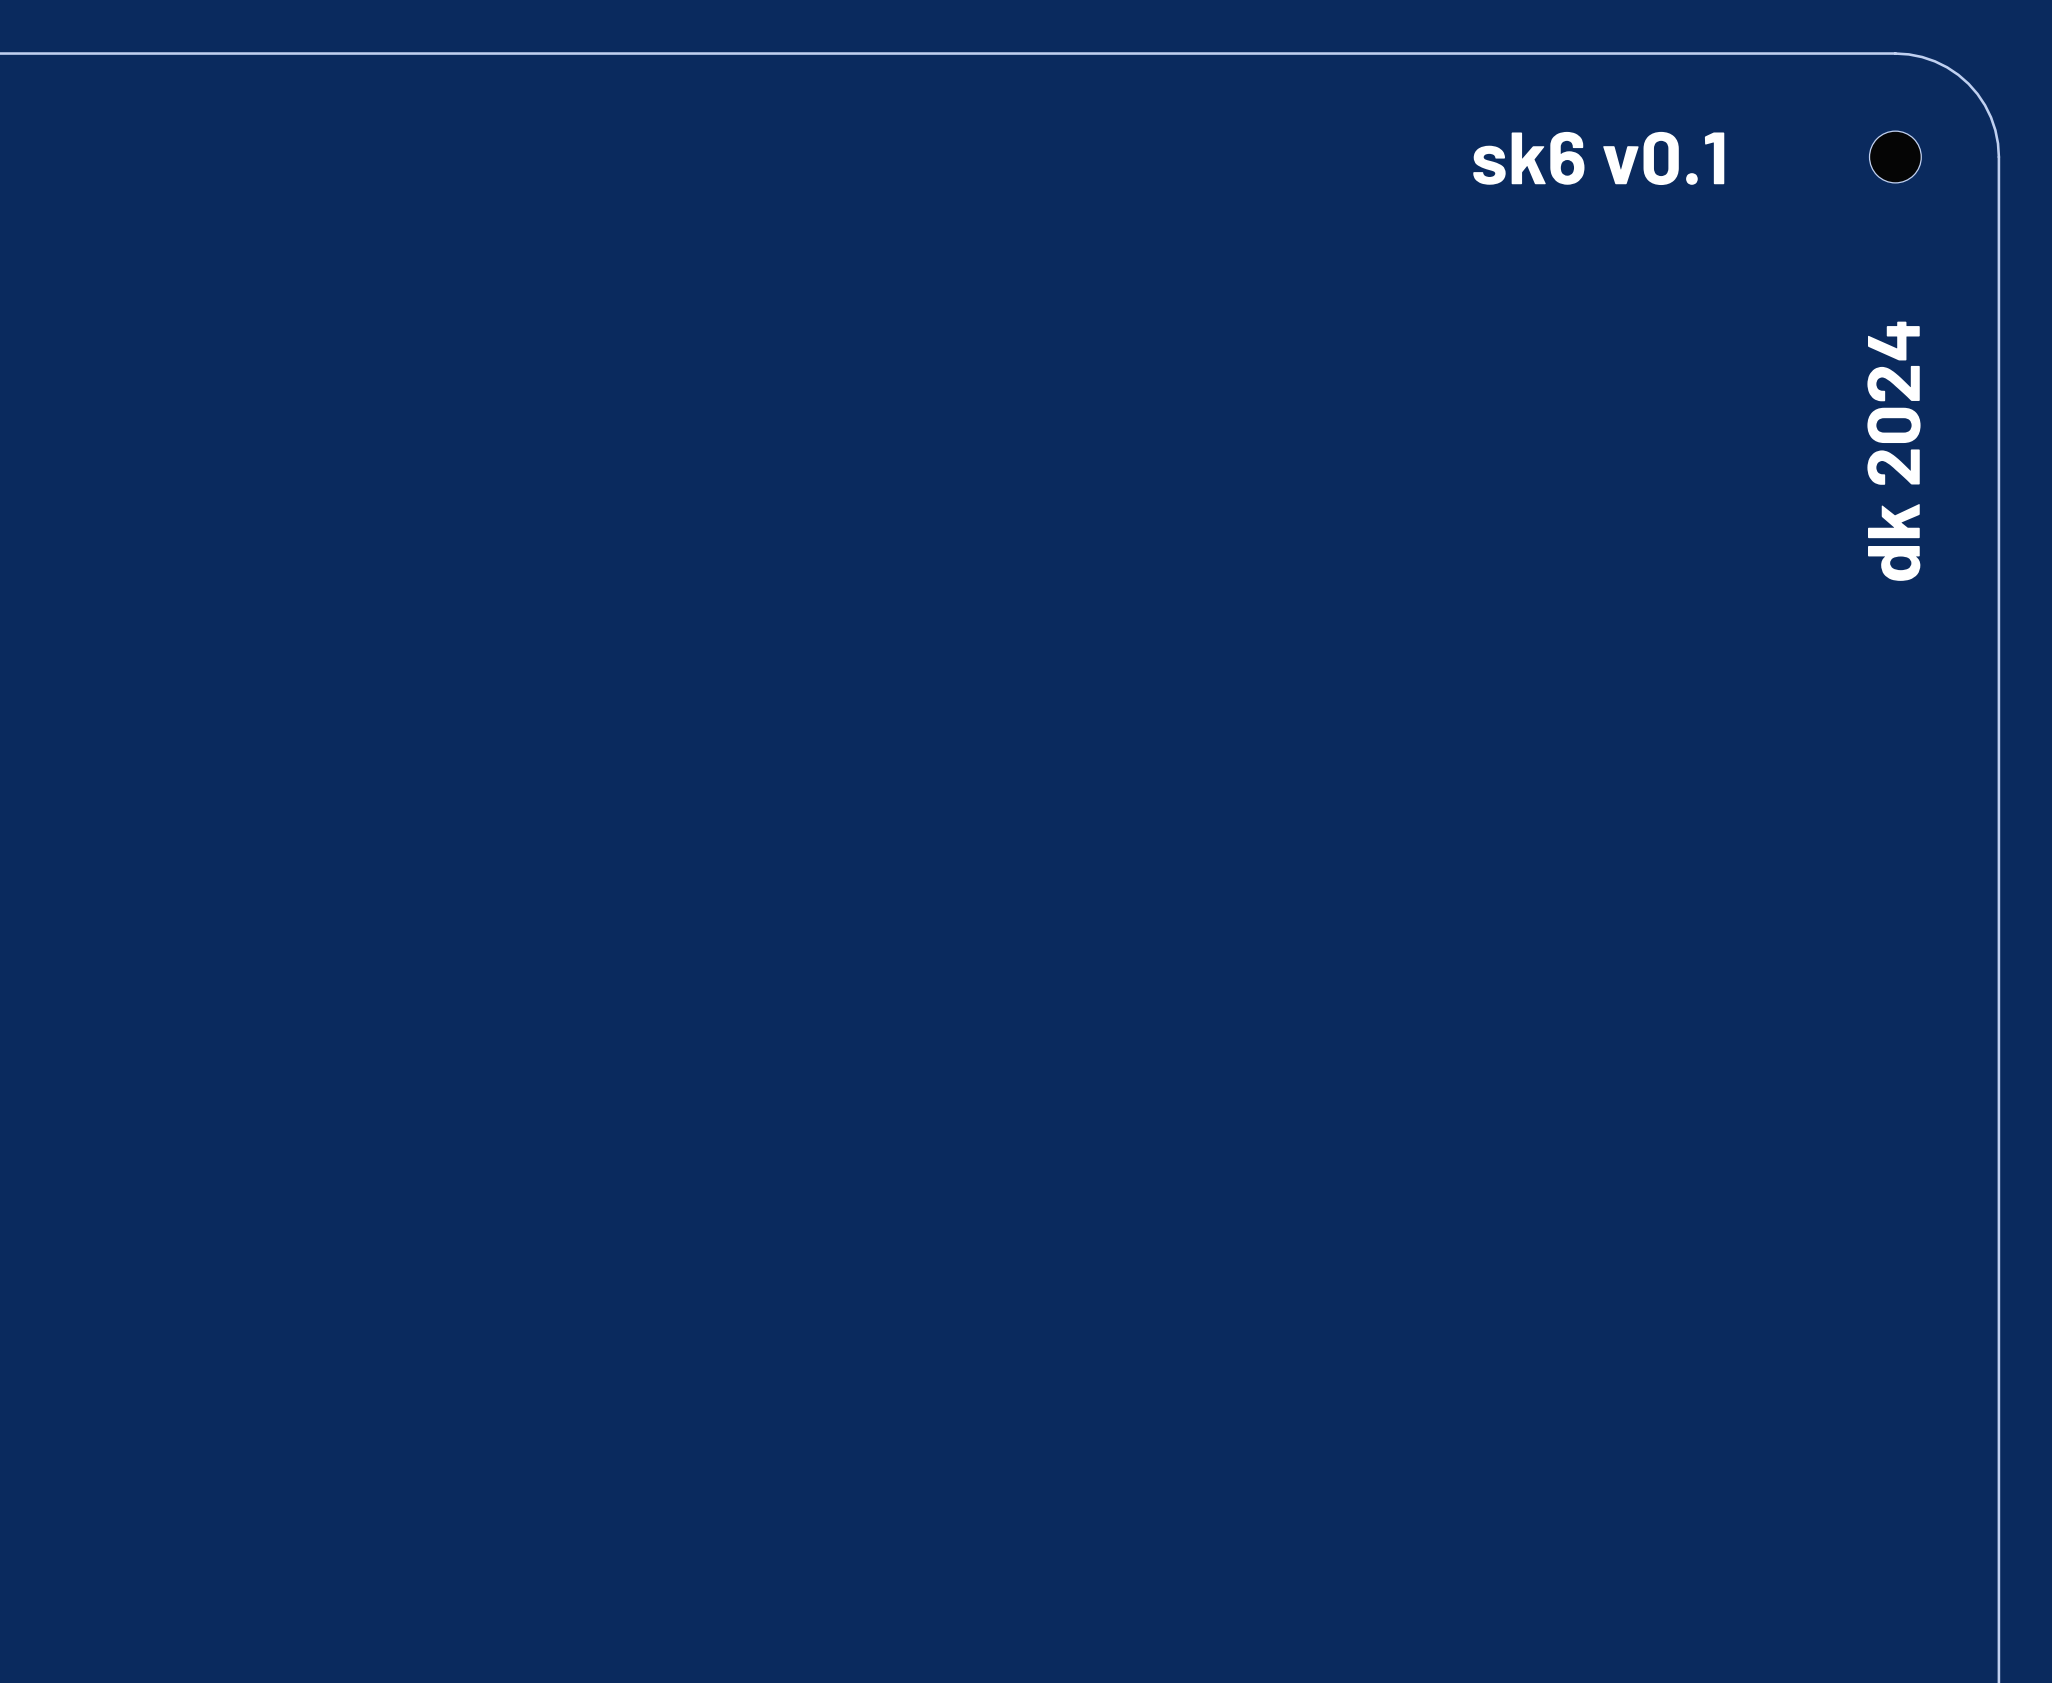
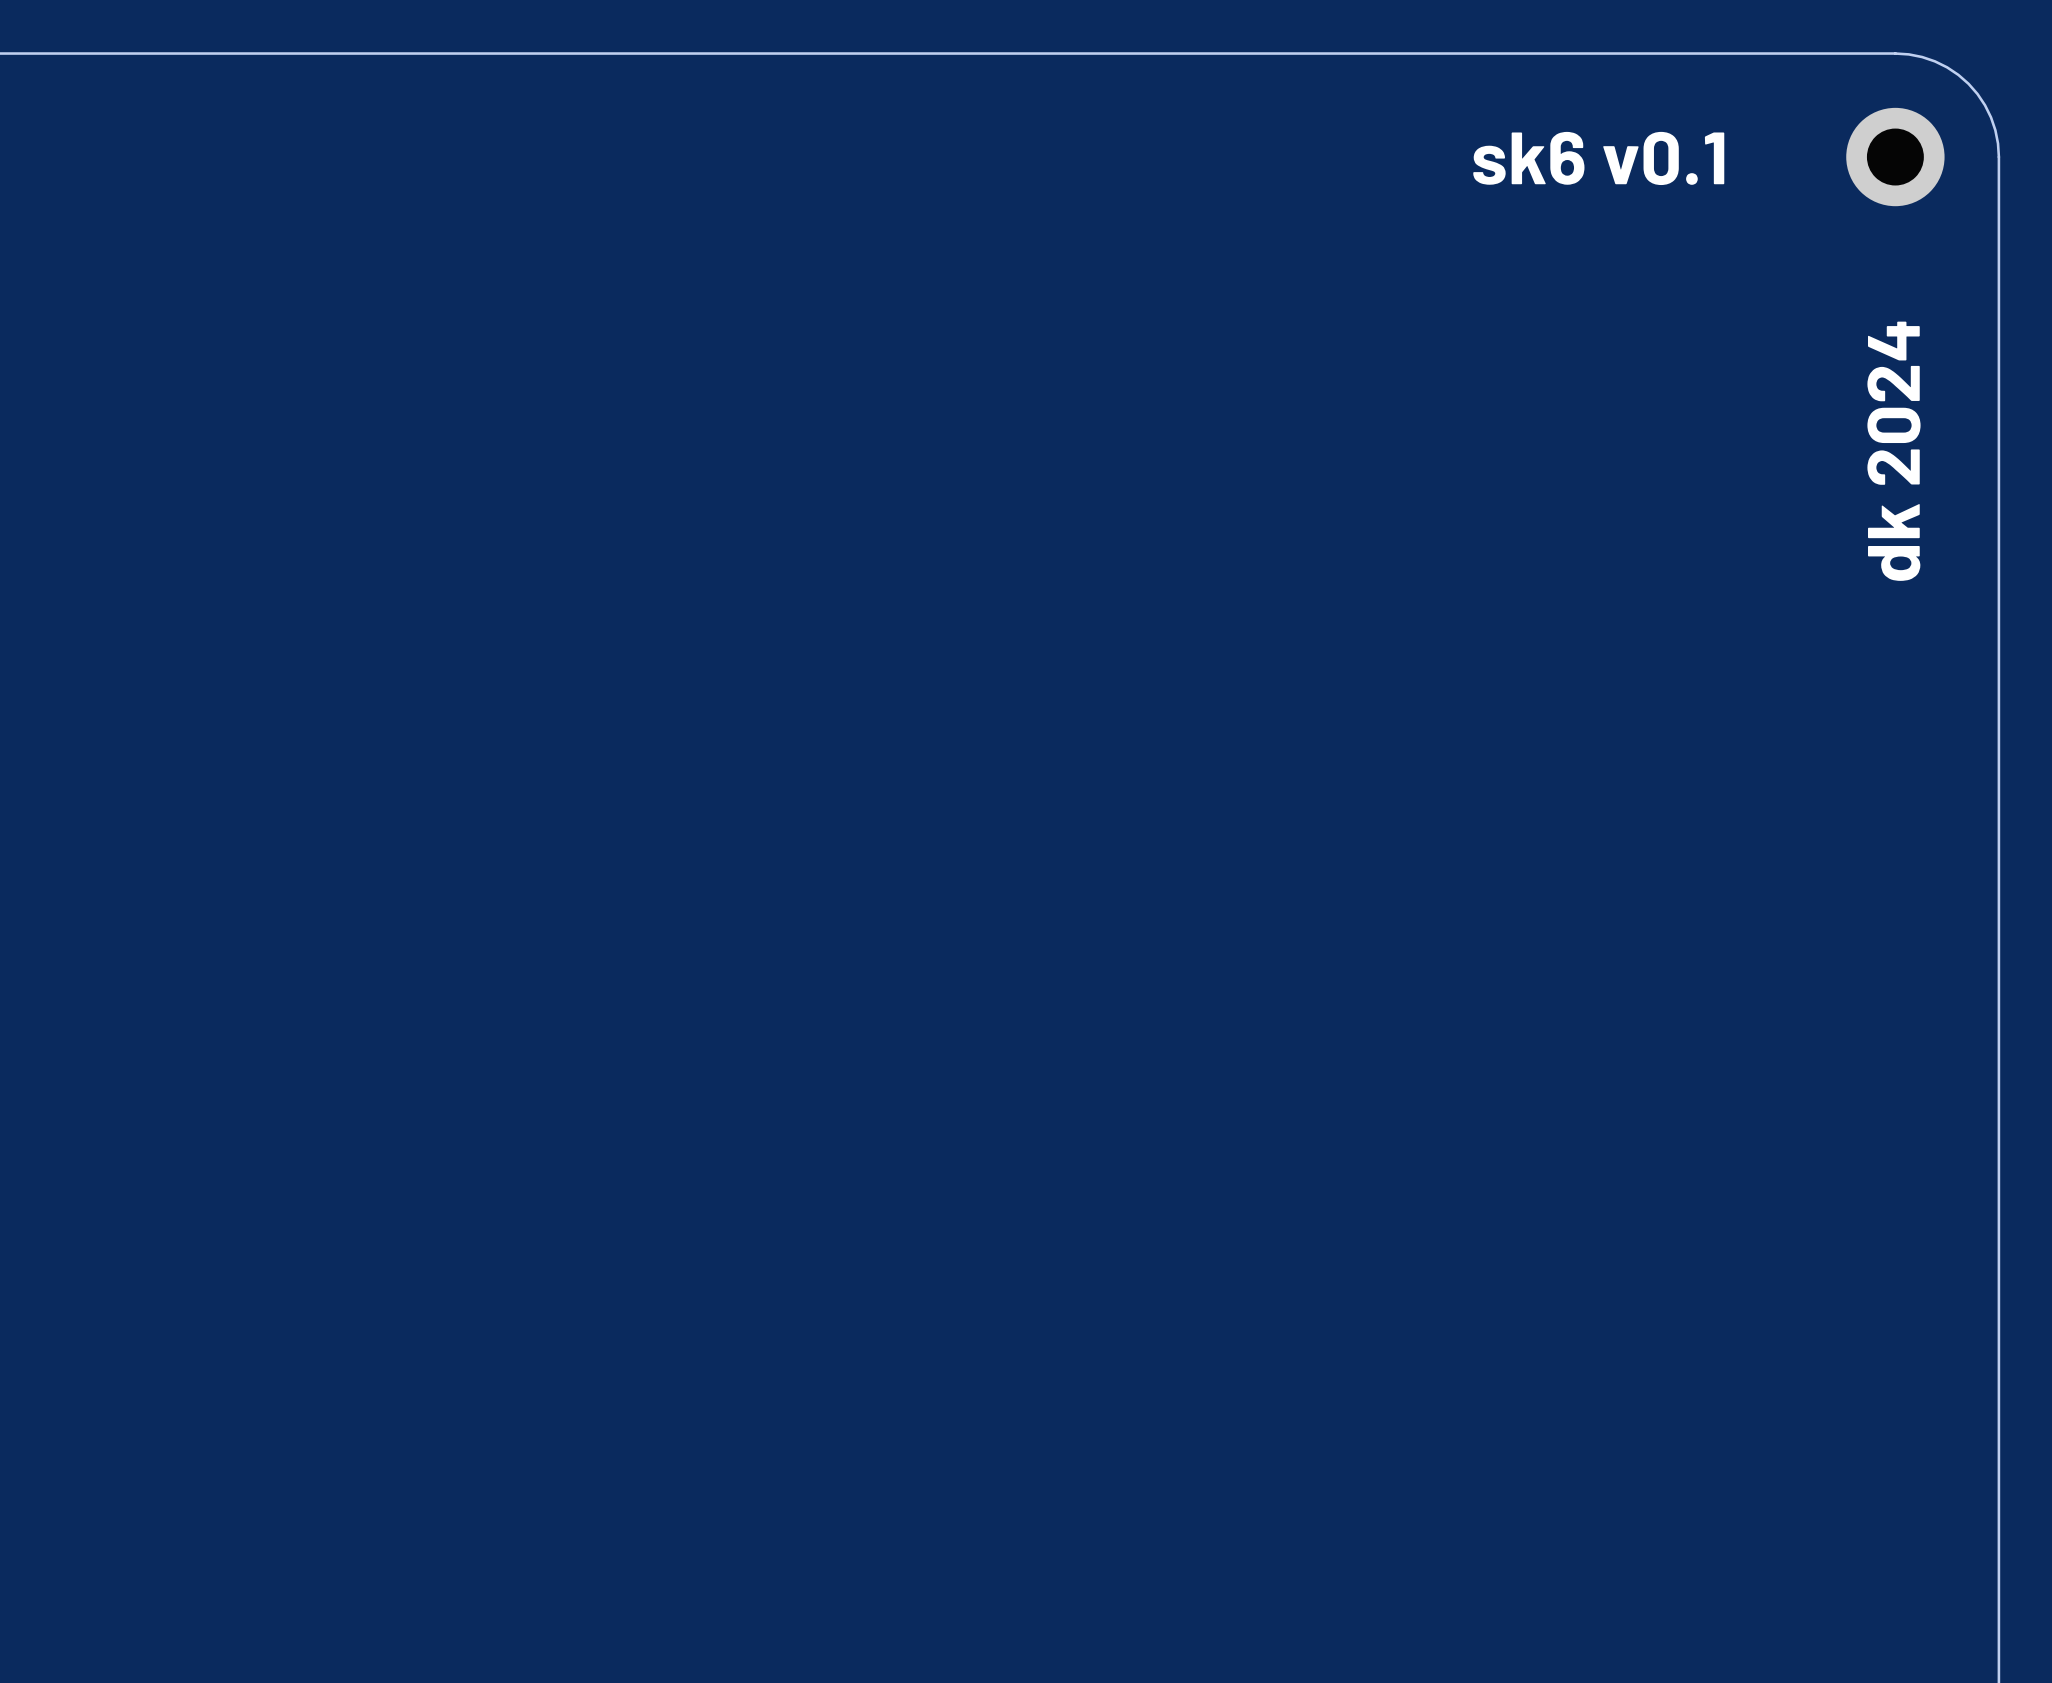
part footprint: [1869, 131, 1922, 183] -> [1846, 107, 1945, 207]

